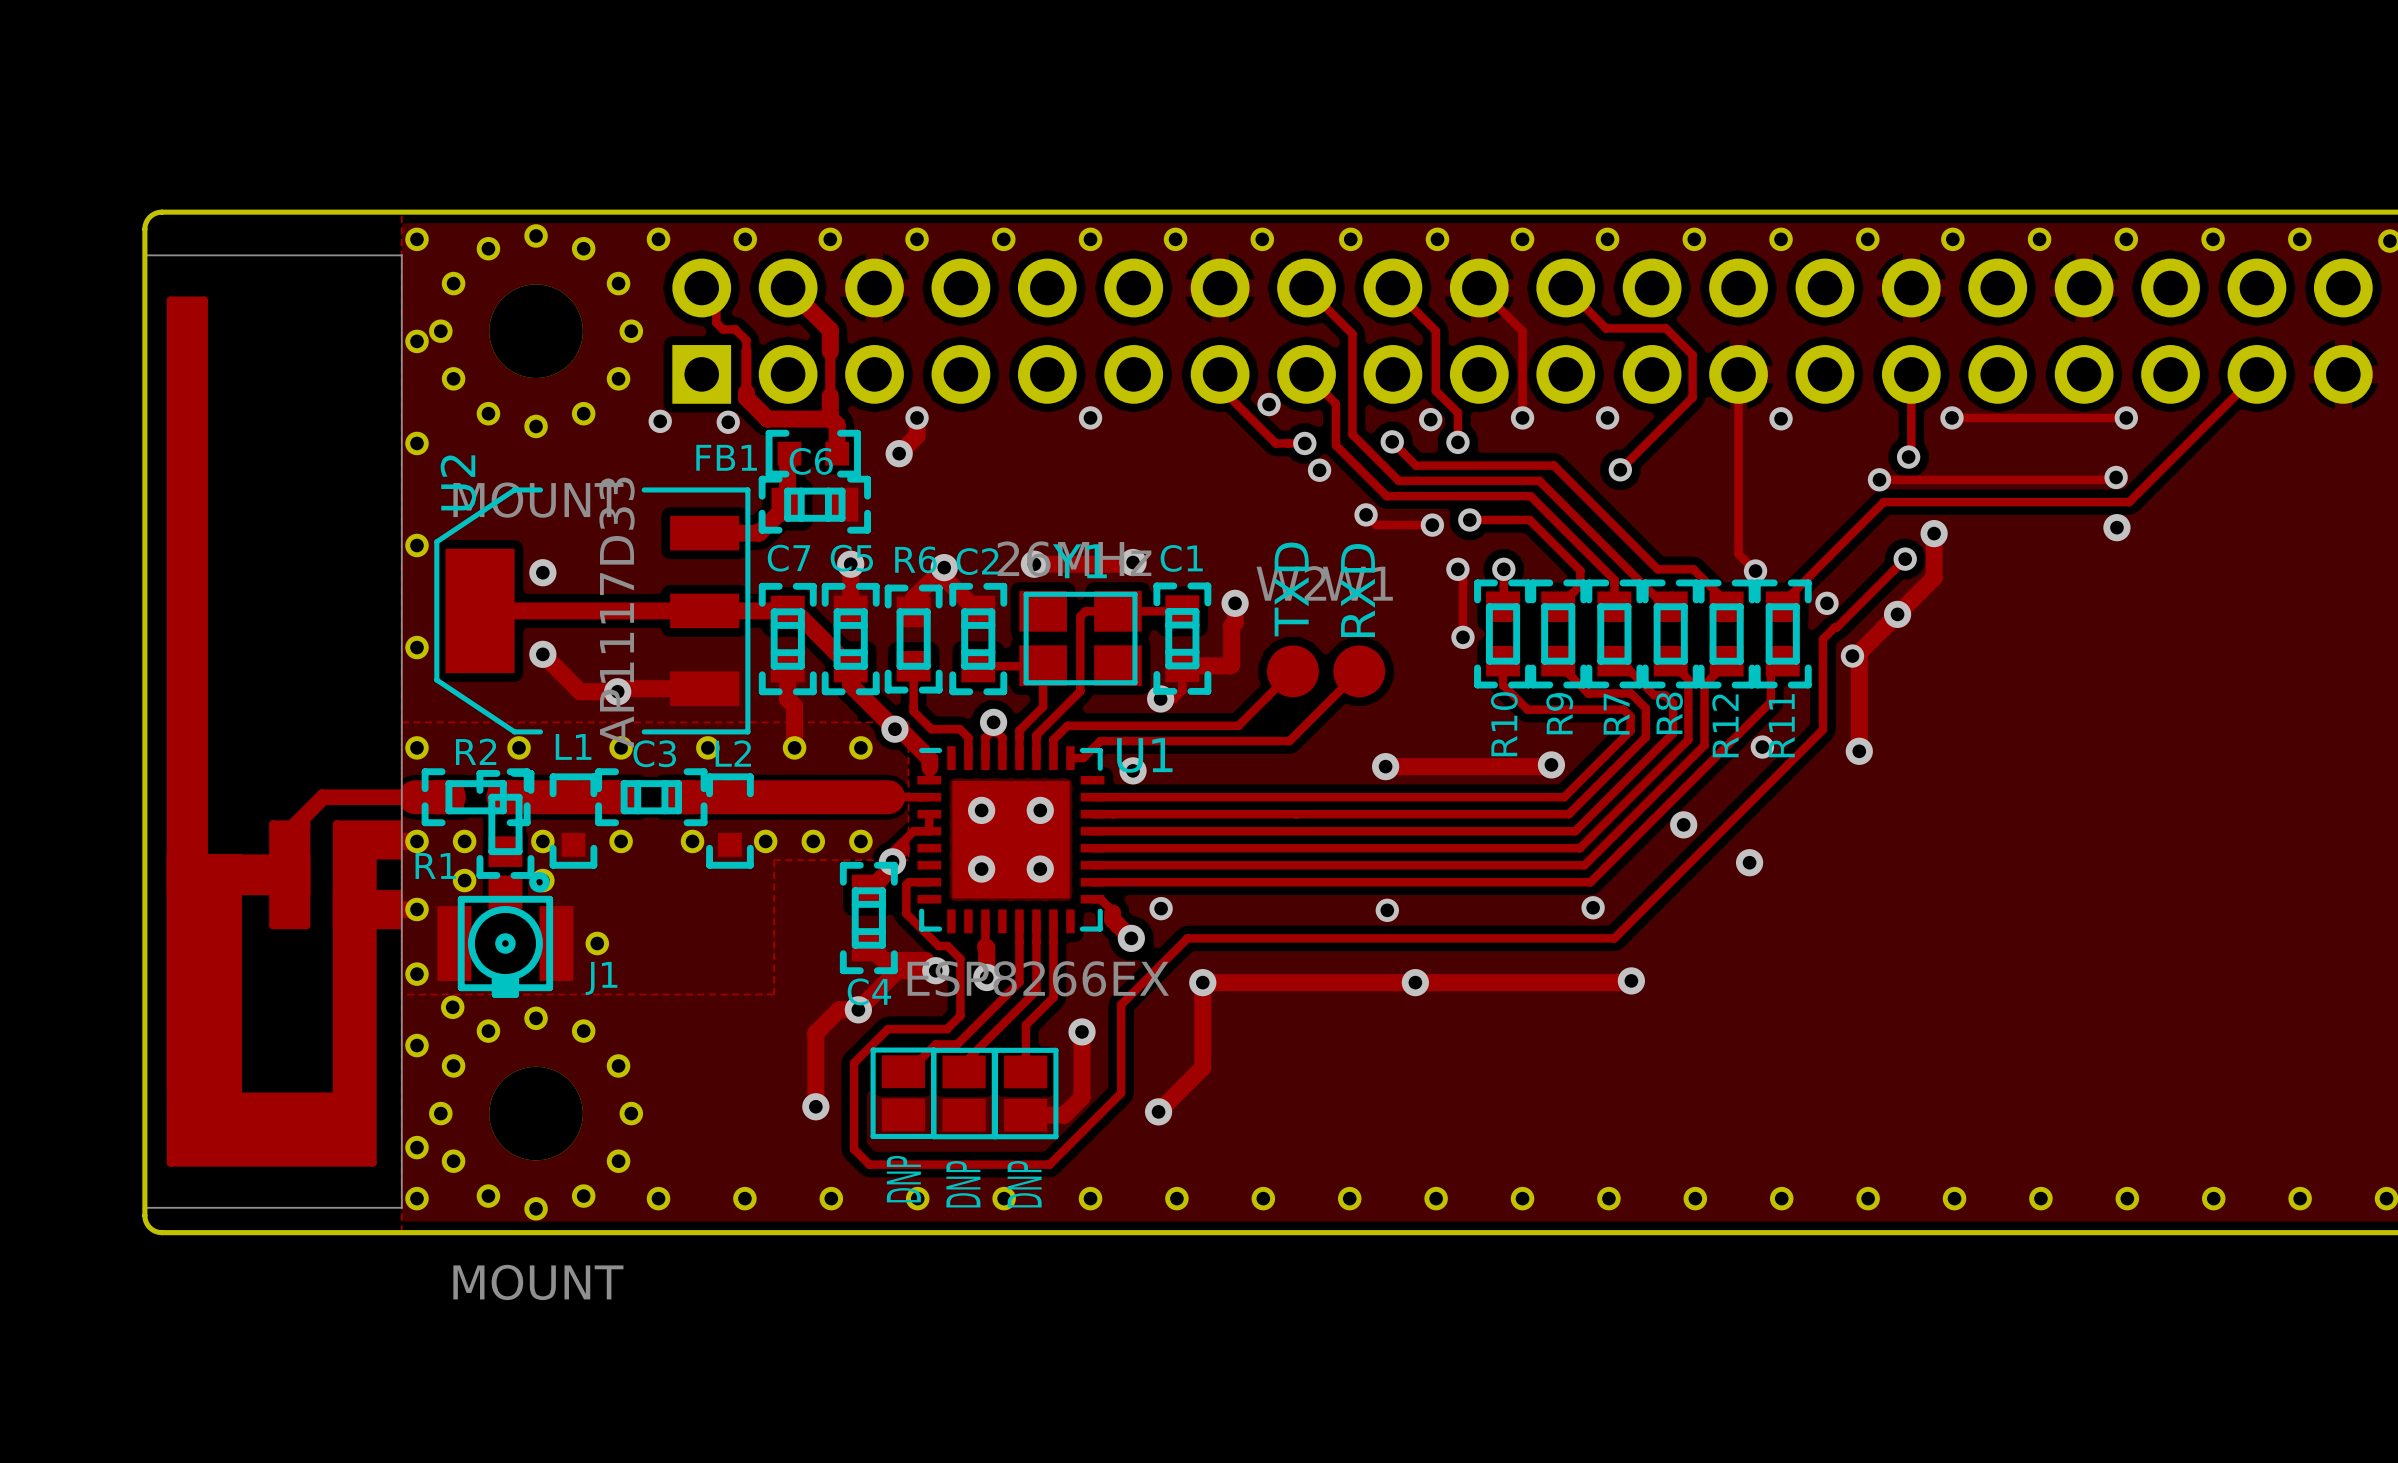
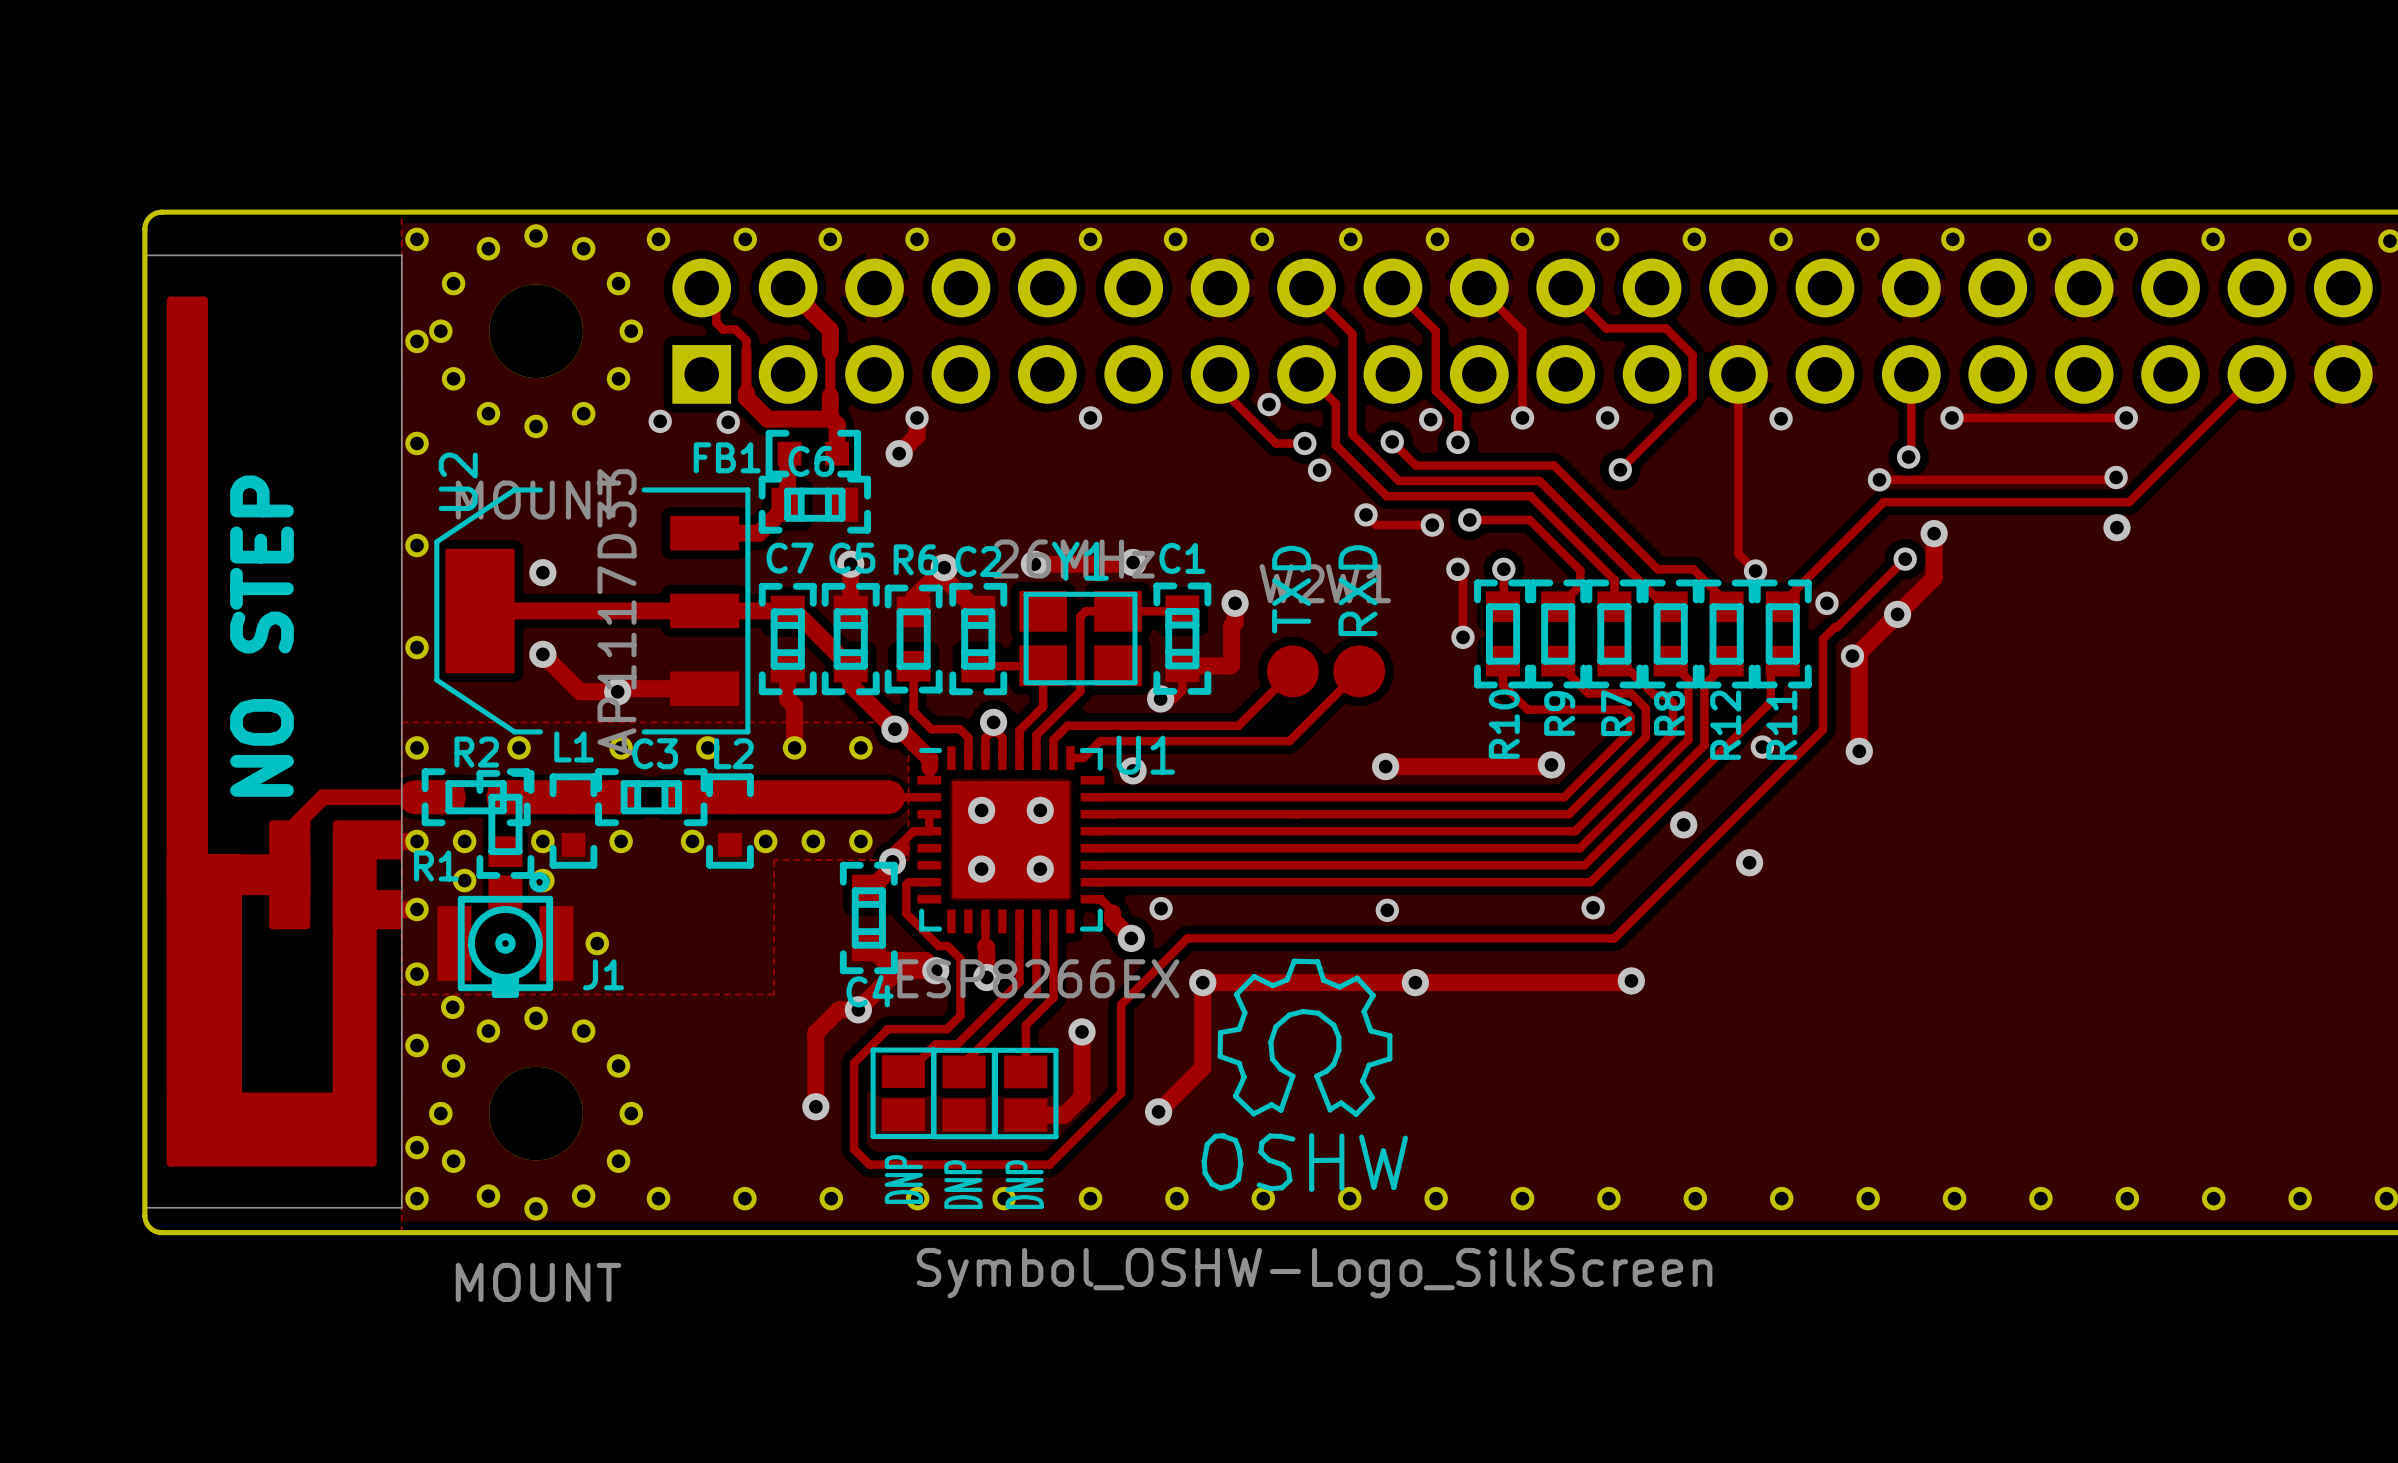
text: none -> NO STEP (262, 636)
drawing: none -> [1201, 958, 1409, 1192]

